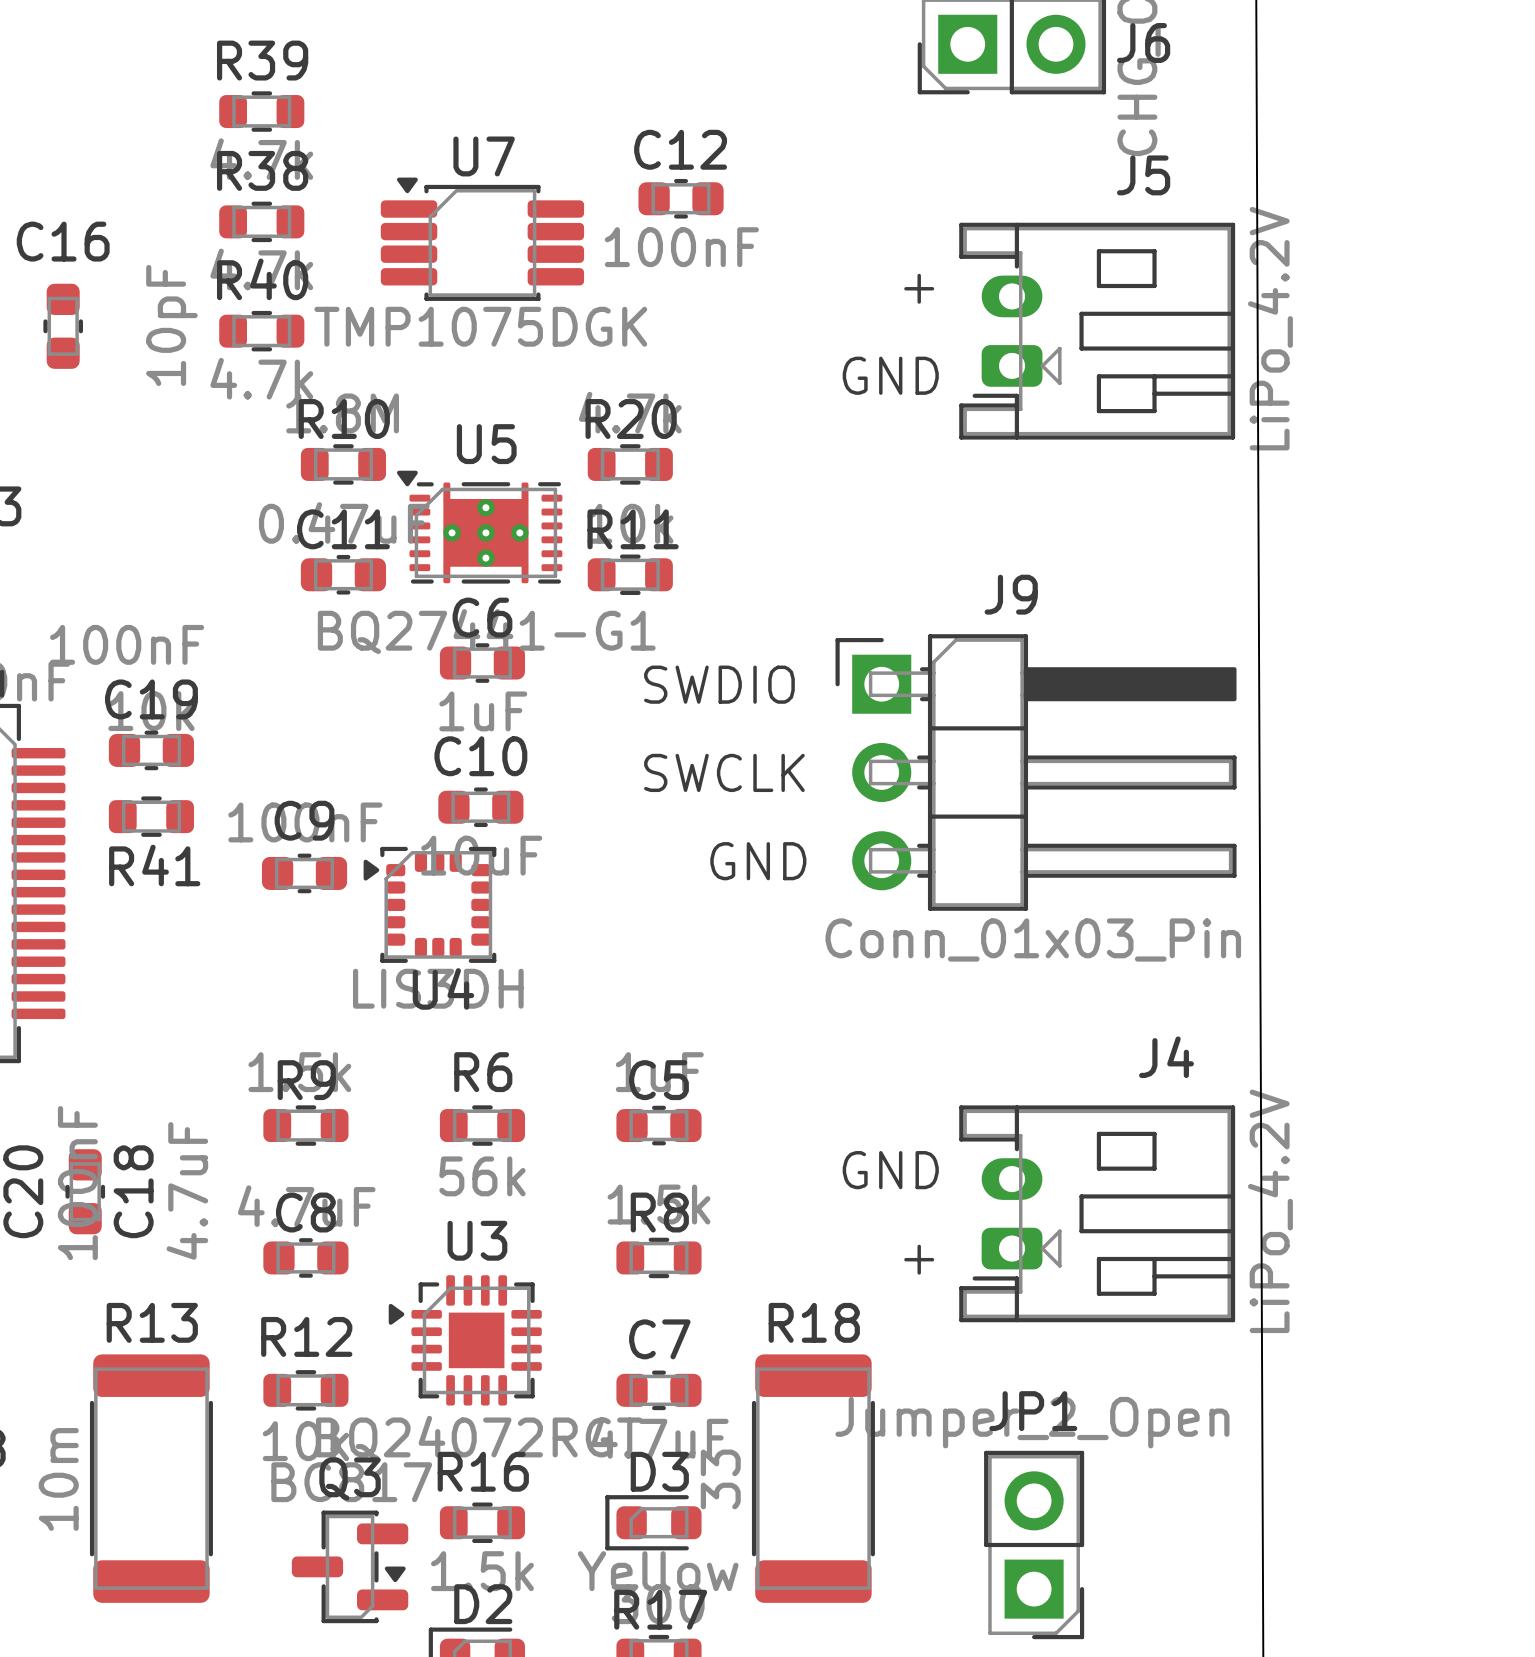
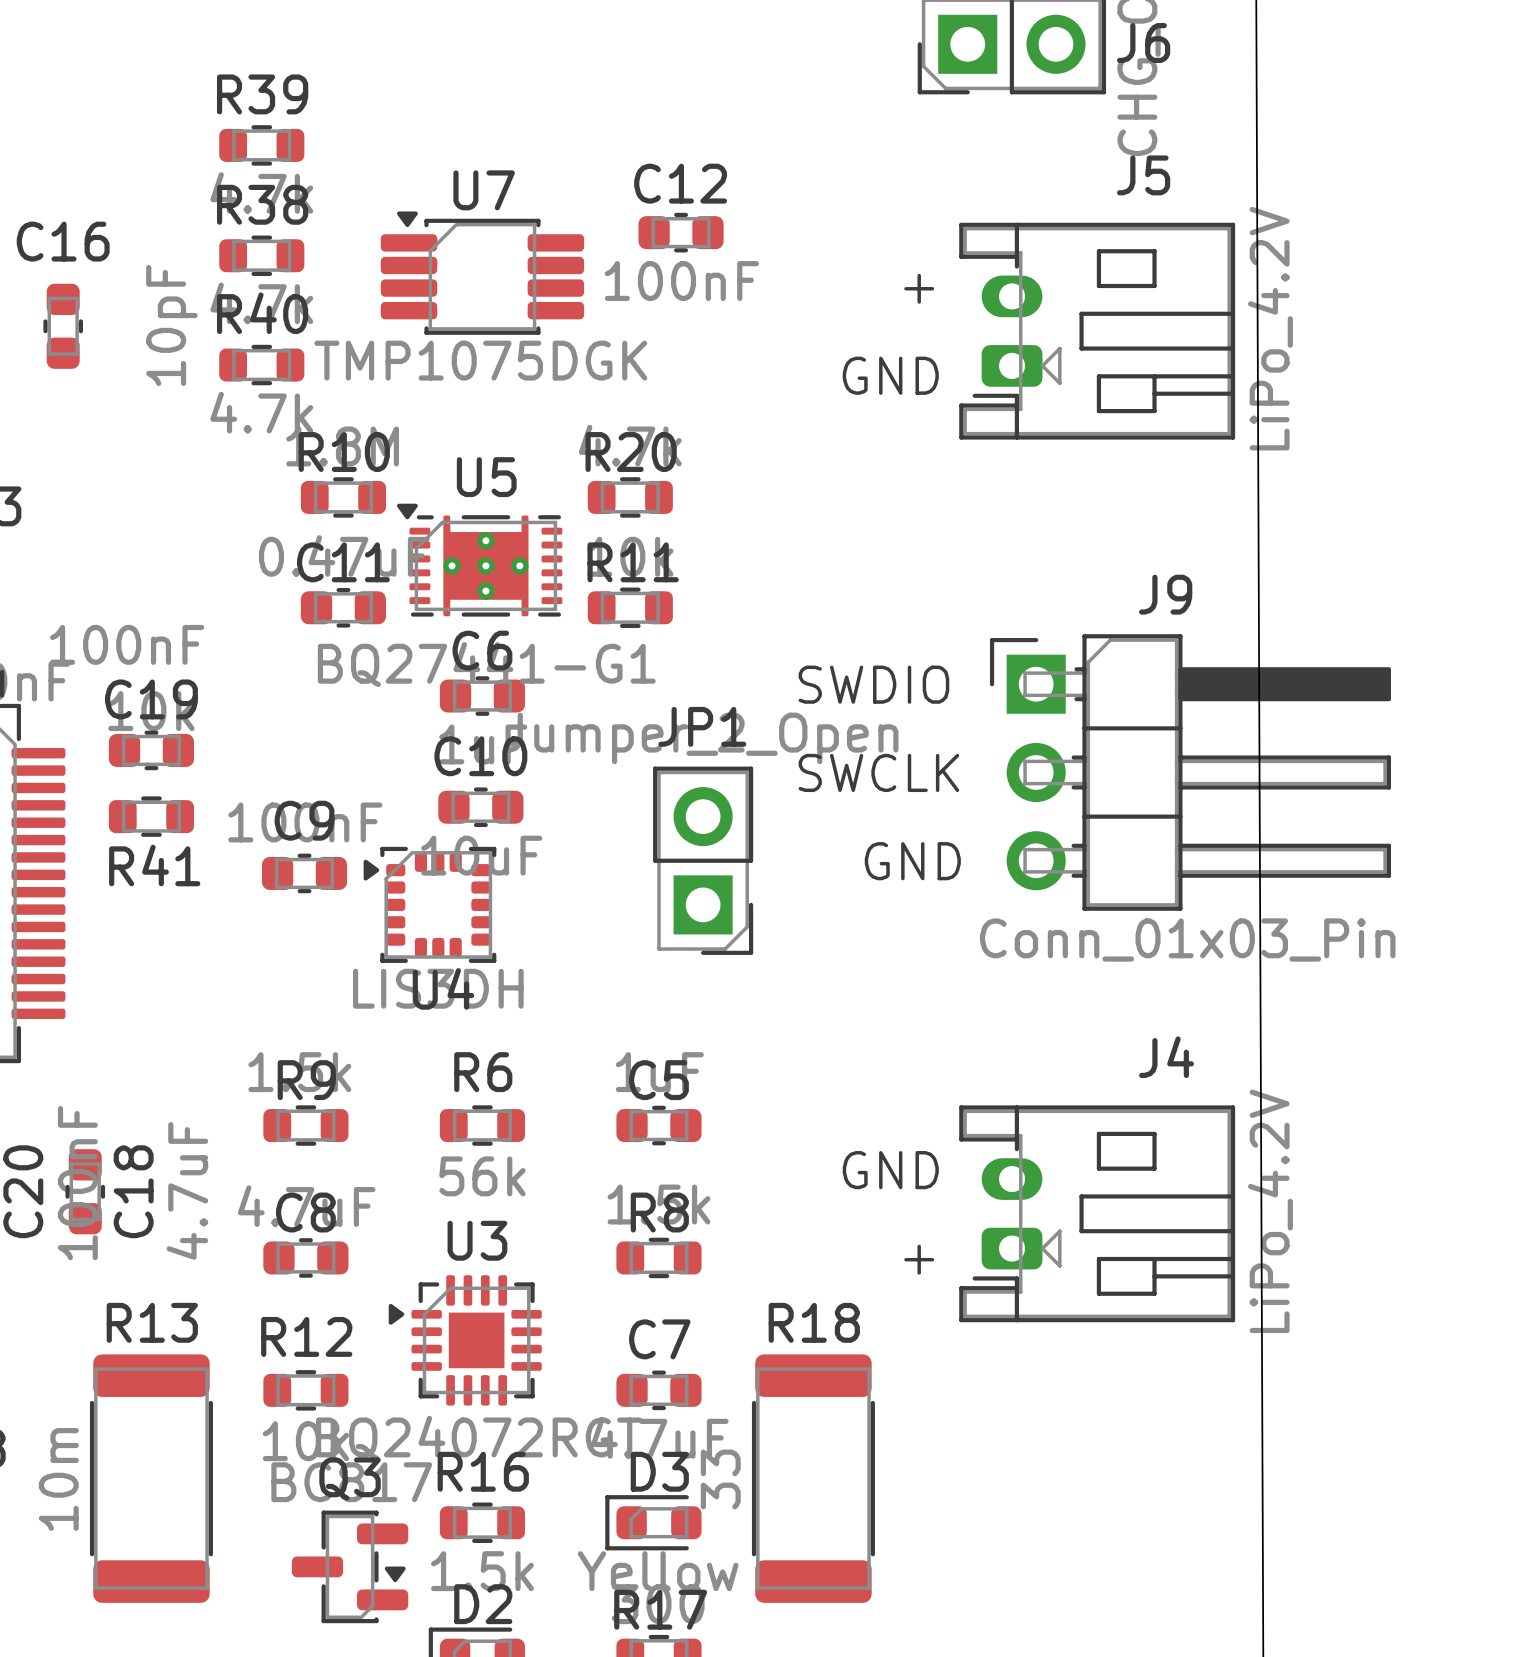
R39 position: (261, 111) -> (261, 145)
C12 position: (681, 198) -> (681, 232)
R38 position: (261, 221) -> (261, 255)
U7 position: (482, 239) -> (482, 273)
R40 position: (261, 331) -> (261, 365)
R10 position: (343, 464) -> (343, 497)
R20 position: (630, 464) -> (630, 497)
U5 position: (479, 527) -> (479, 560)
C11 position: (343, 574) -> (343, 607)
R11 position: (630, 574) -> (630, 607)
C6 position: (482, 663) -> (482, 696)
text position: SWDIO (719, 684) -> SWDIO (873, 684)
text position: SWCLK (724, 772) -> SWCLK (878, 772)
J9 position: (1036, 772) -> (1190, 772)
text position: GND (758, 861) -> GND (912, 861)
JP1 position: (1034, 1544) -> (703, 860)

